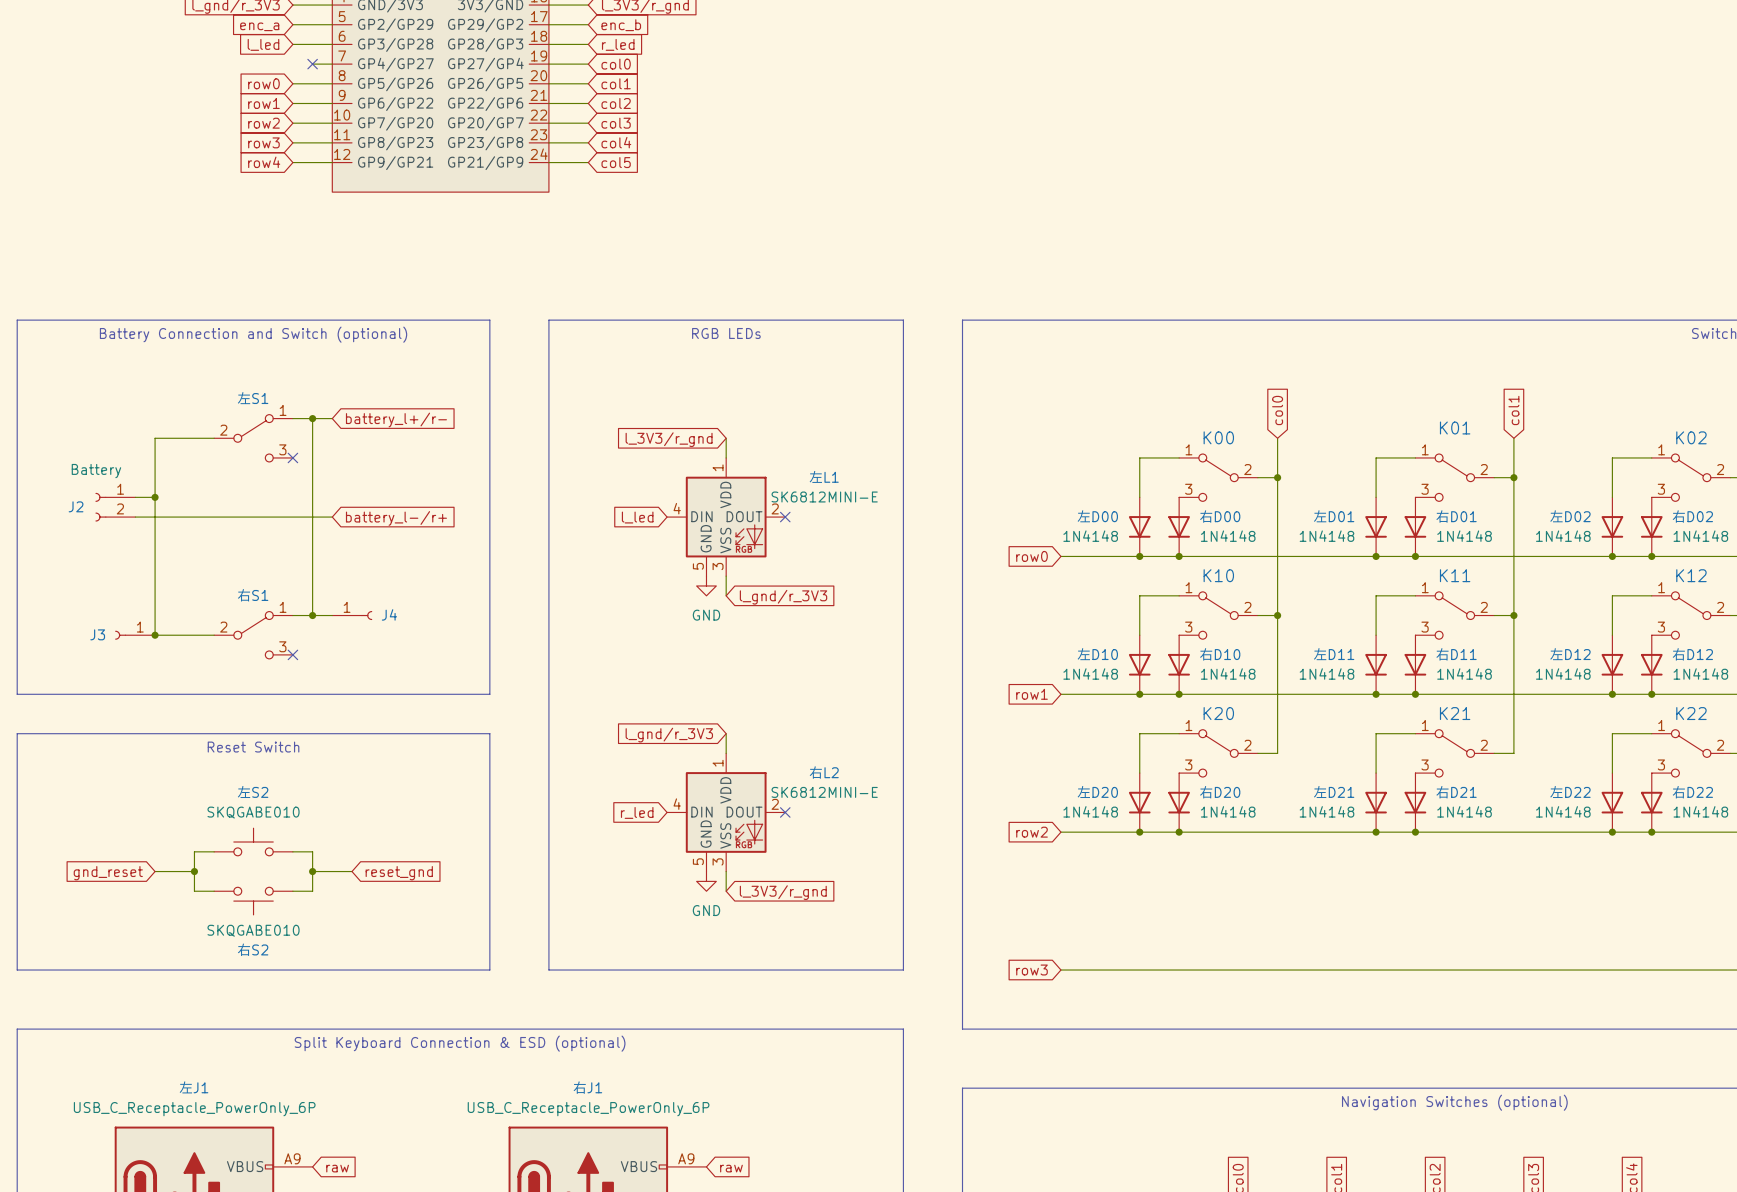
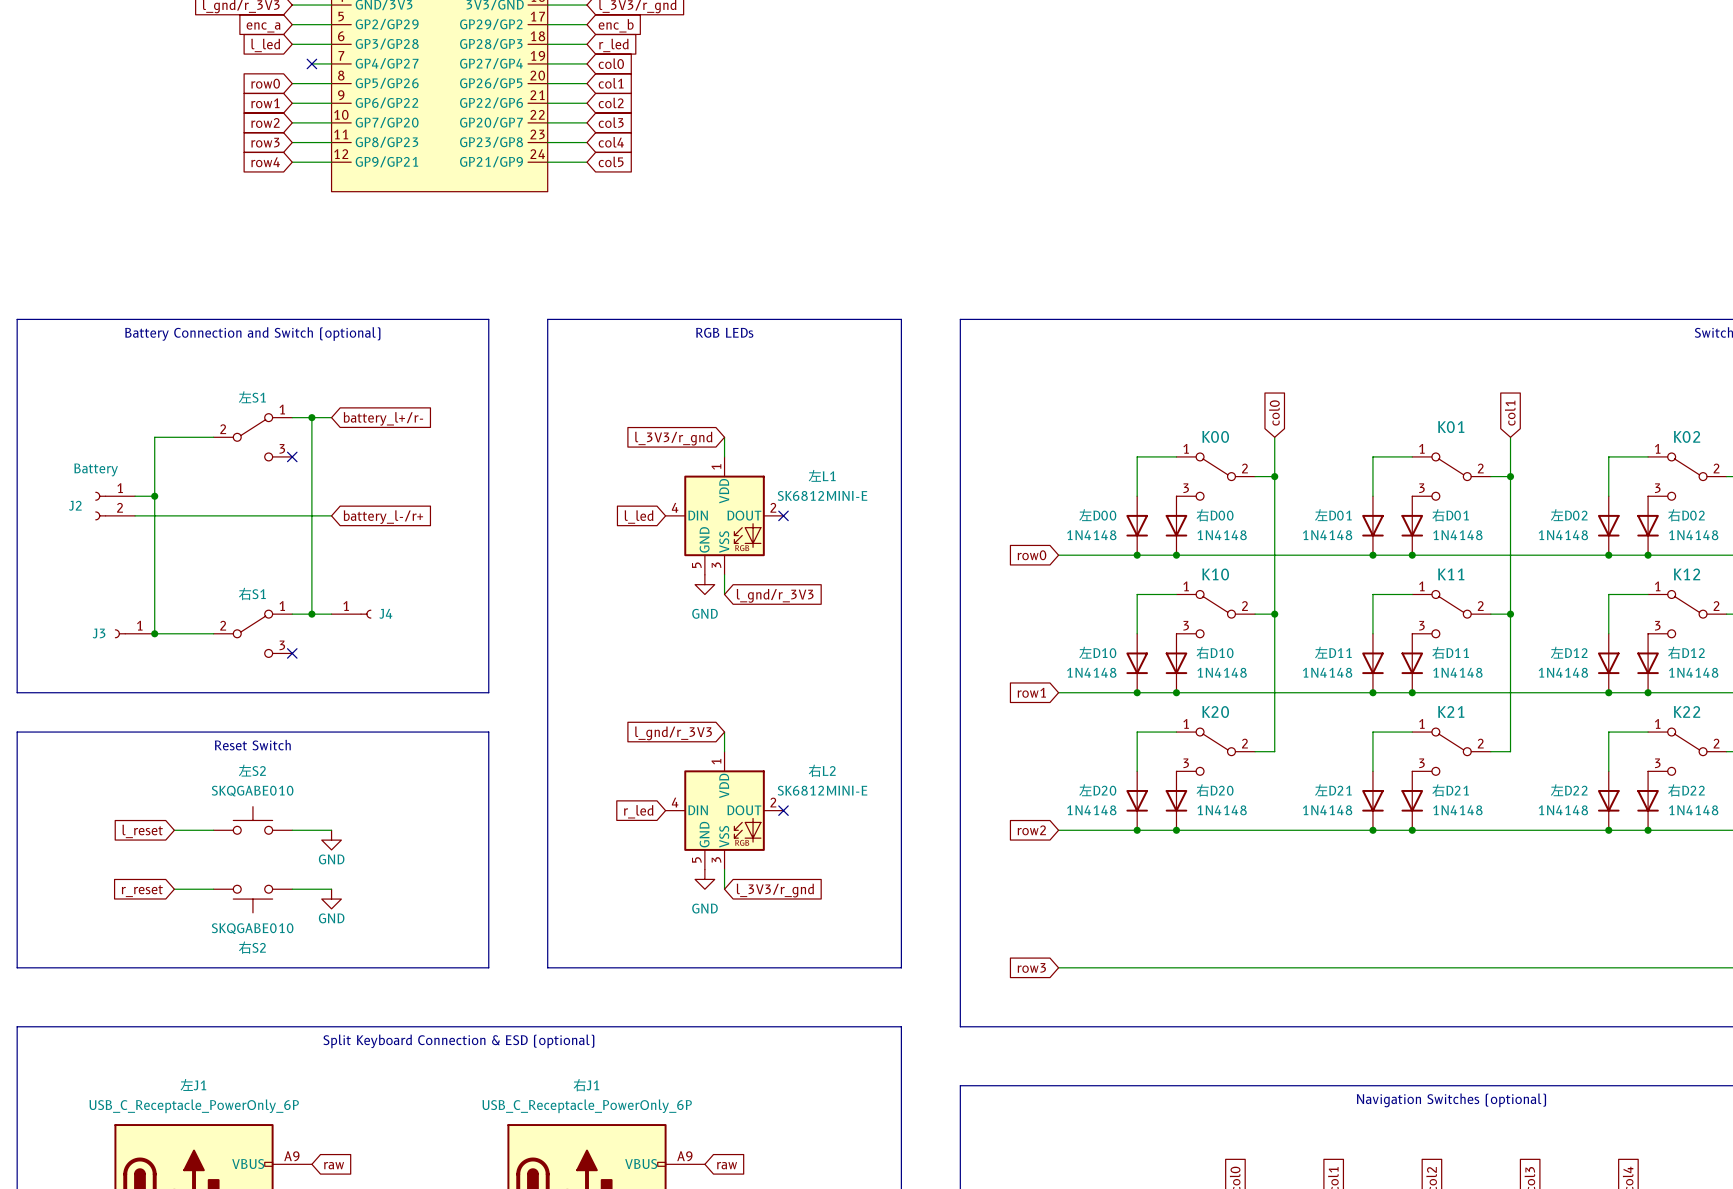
global label: none -> l_reset (142, 831)
左S2 position: (253, 842) -> (252, 820)
power symbol: none -> GND (331, 840)
wire: (214, 851) (194, 851) (194, 891) -> (174, 889) (194, 889)
wire: (292, 851) (312, 851) (312, 891) -> (331, 889) (311, 889)
wire: (155, 871) (194, 871) -> (174, 830) (213, 830)
junction: (194, 871) -> none
wire: (312, 871) (352, 871) -> (292, 830) (331, 830)
junction: (312, 871) -> none
global label: gnd_reset (108, 873) -> r_reset (142, 891)
global label: reset_gnd (399, 873) -> none
power symbol: none -> GND (331, 899)

